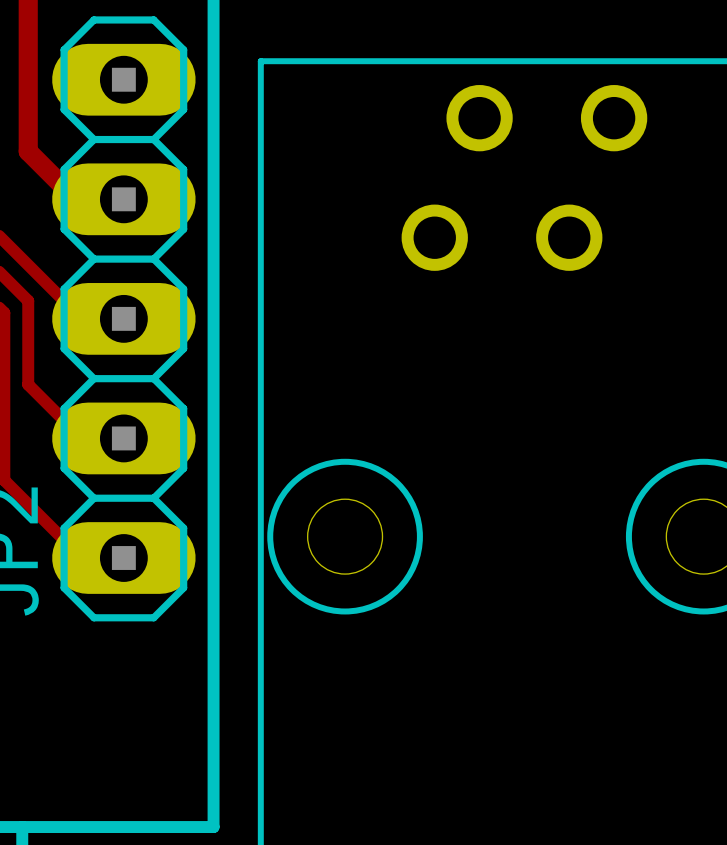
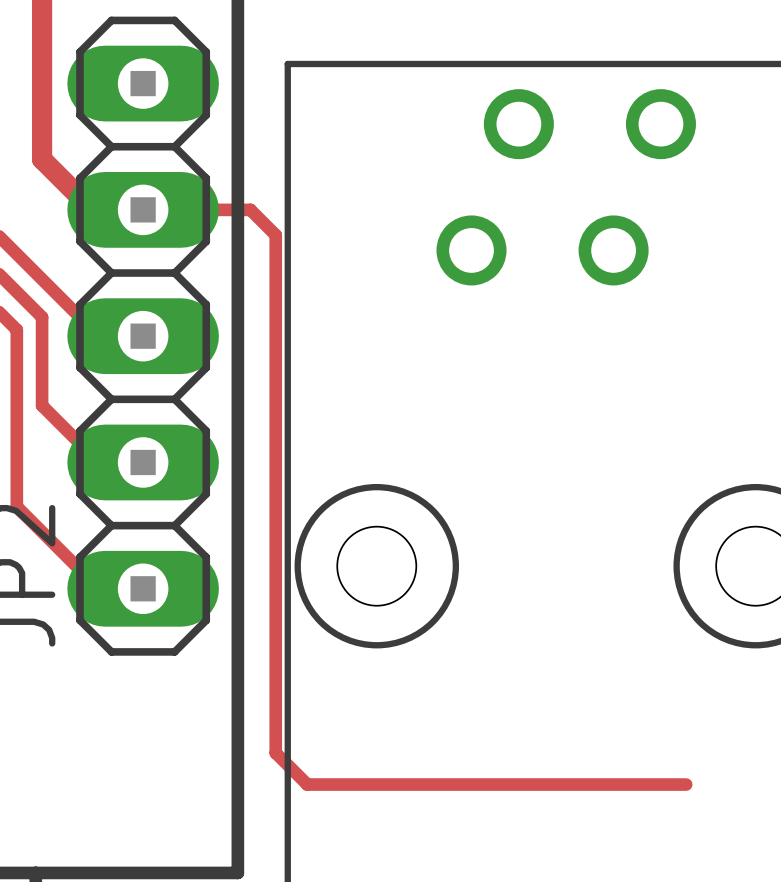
track: none -> (143, 209) (250, 209) (275, 235) (275, 752) (307, 784) (686, 784)

